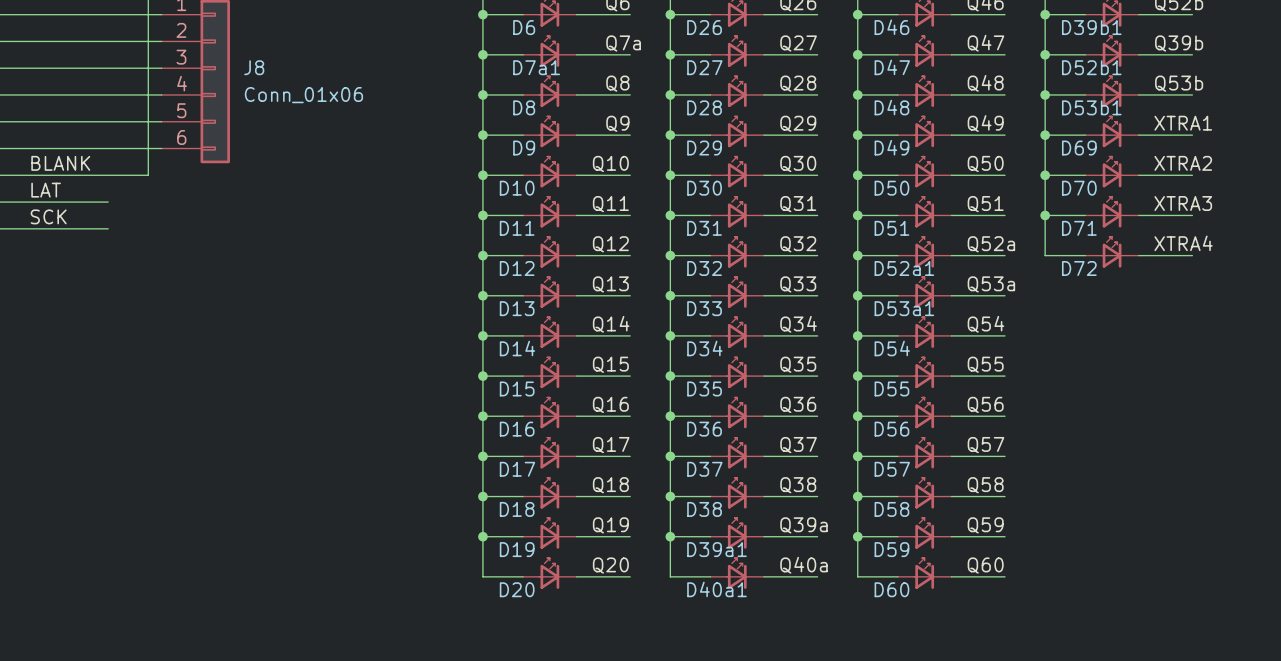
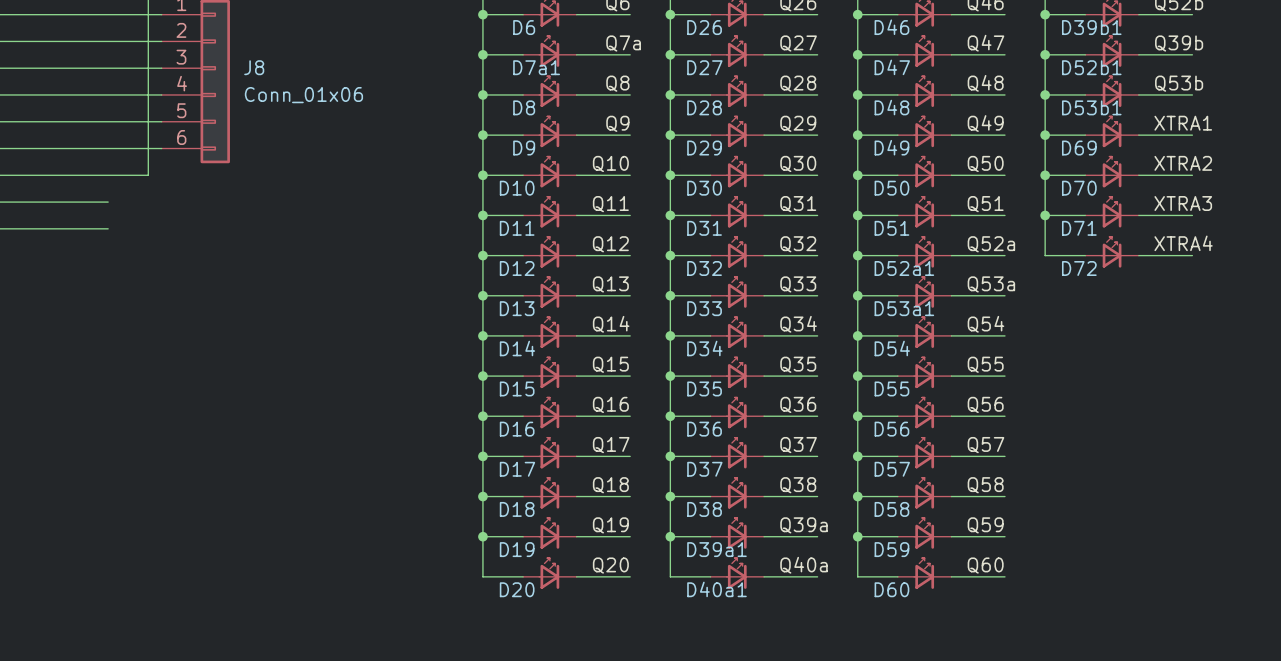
label: BLANK (60, 163) -> none
label: LAT (46, 190) -> none
label: SCK (48, 216) -> none

